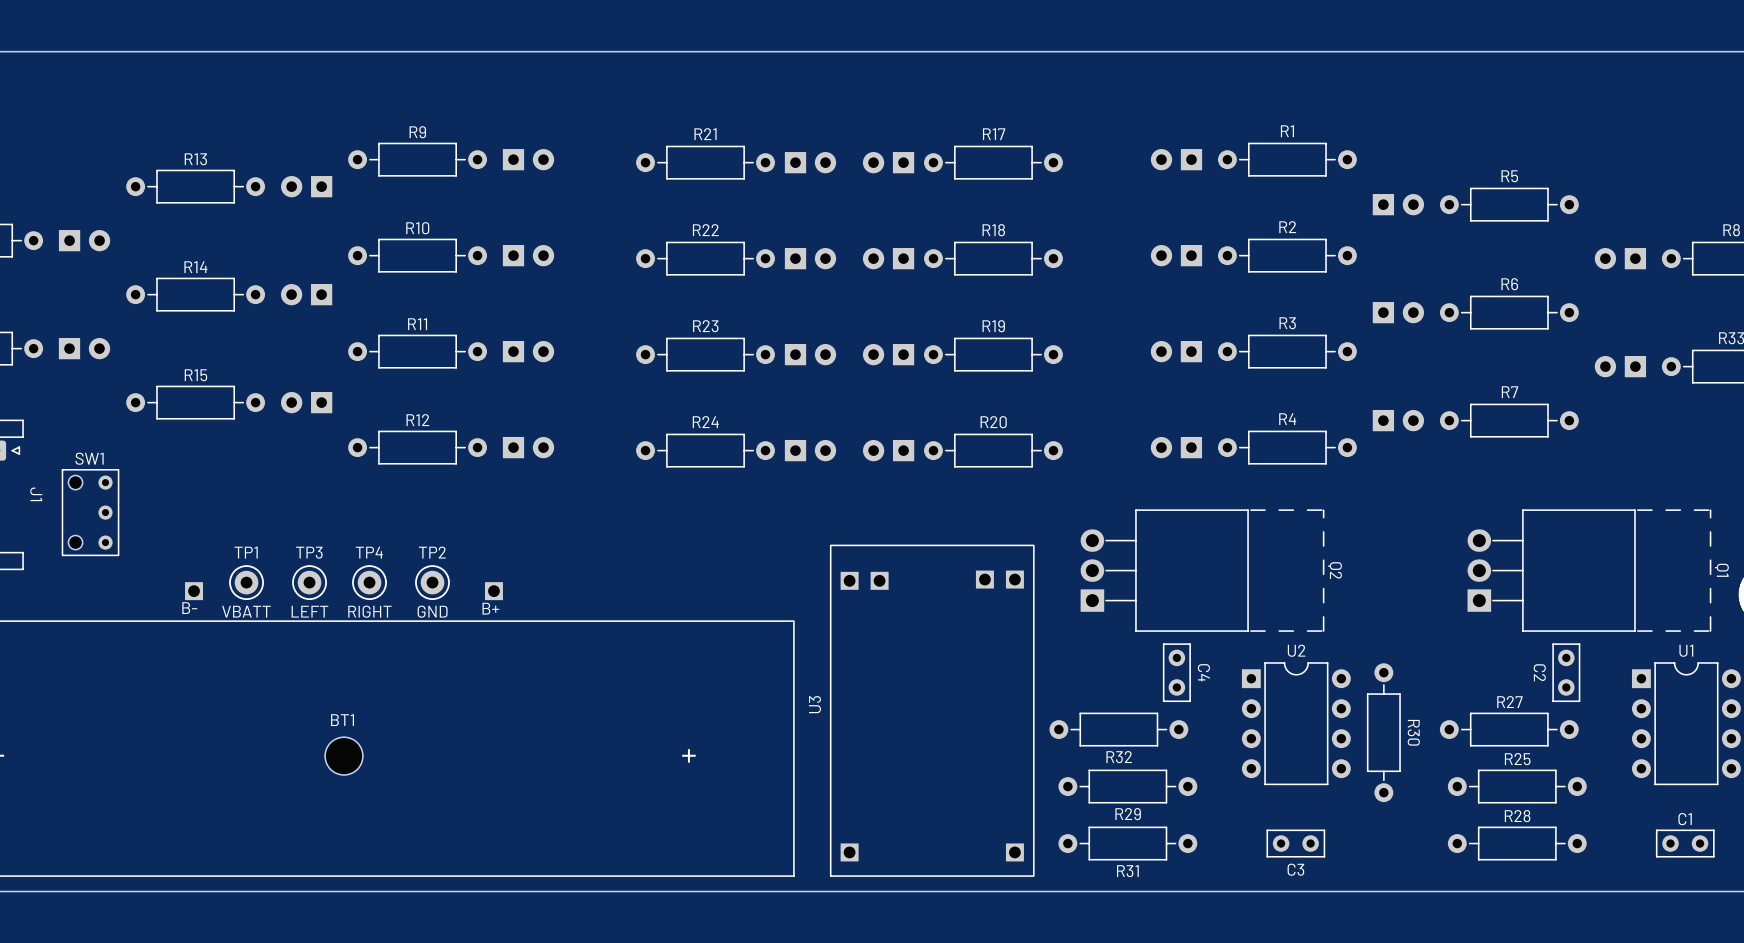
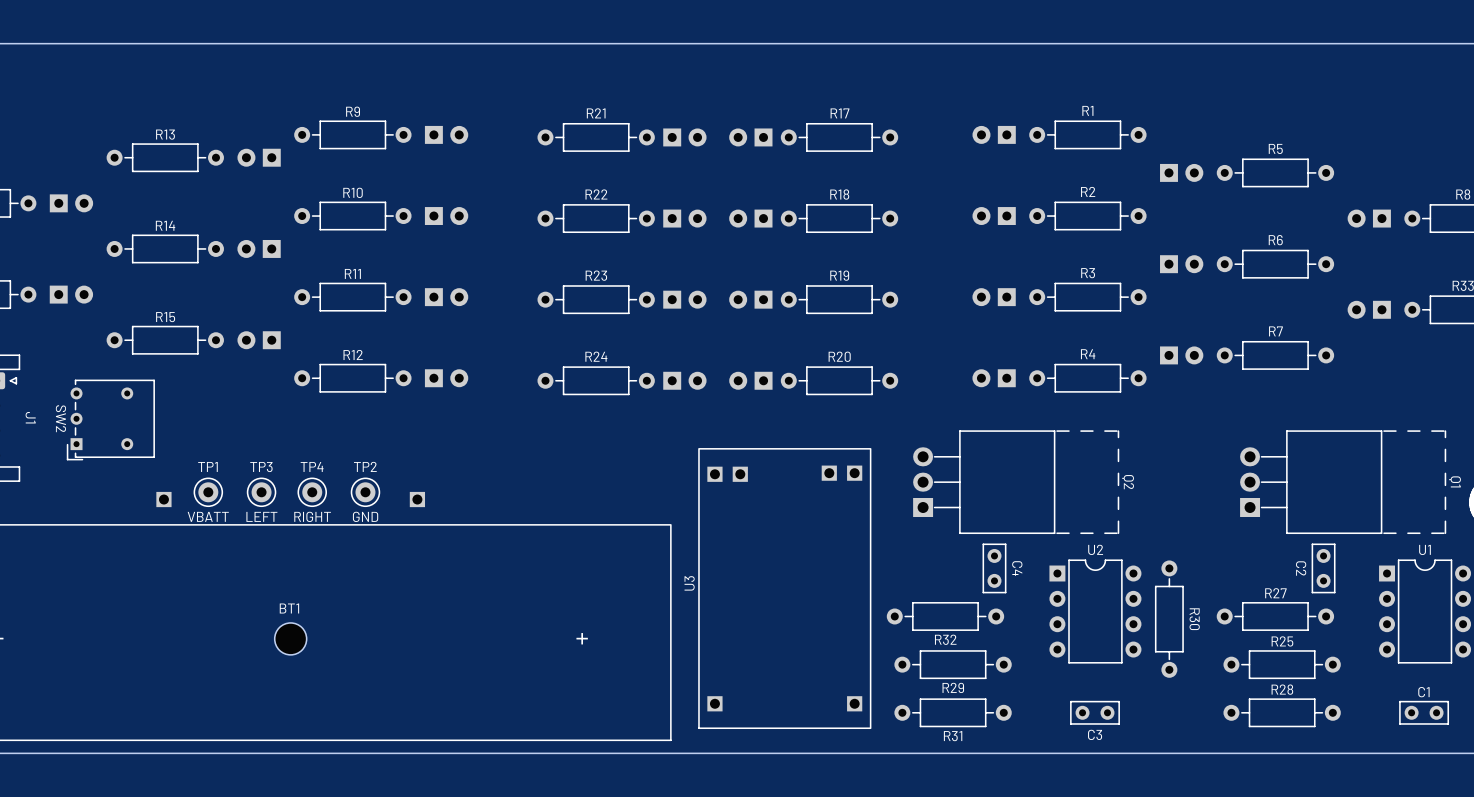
SW2: none -> (110, 419)
SW1: (90, 512) -> none
U3 footprint: [830, 544, 1035, 877] -> [698, 448, 872, 729]
text: B- (189, 608) -> none
text: B+ (490, 608) -> none

